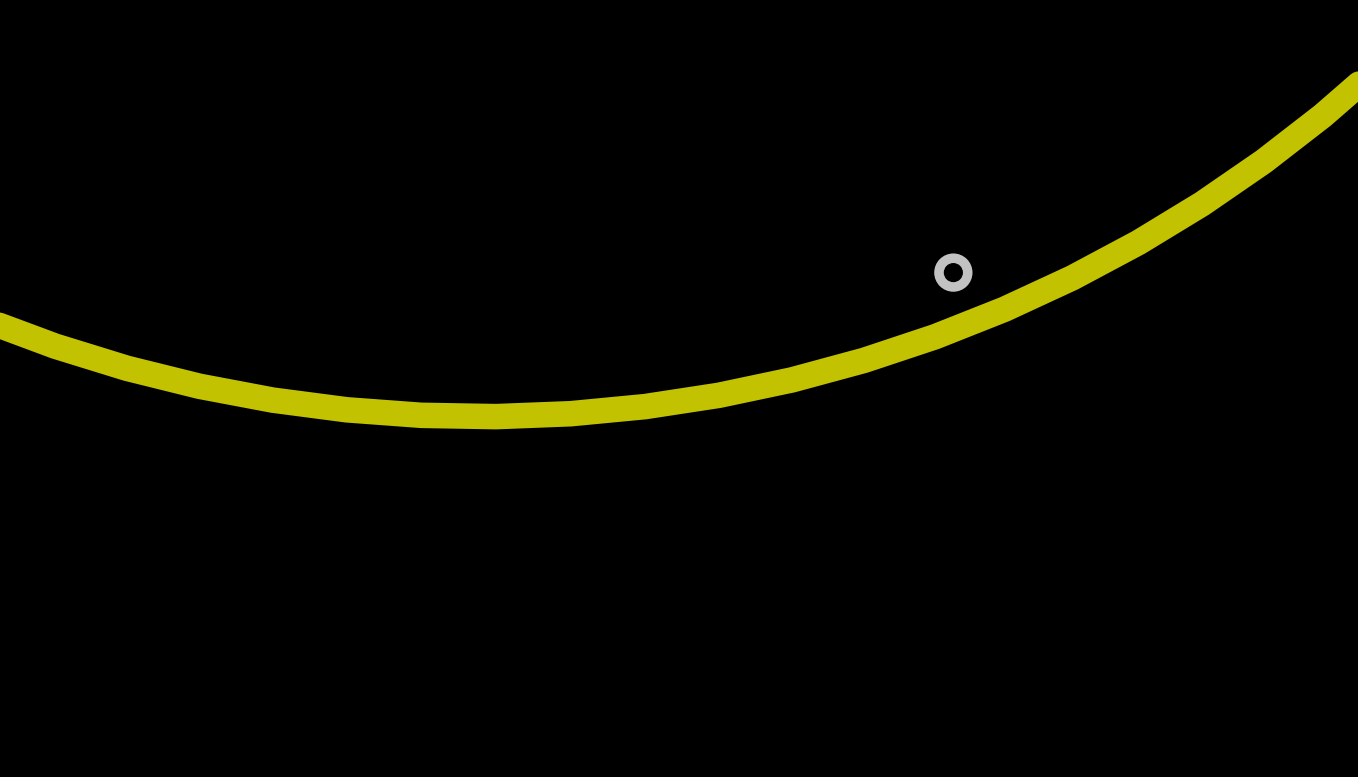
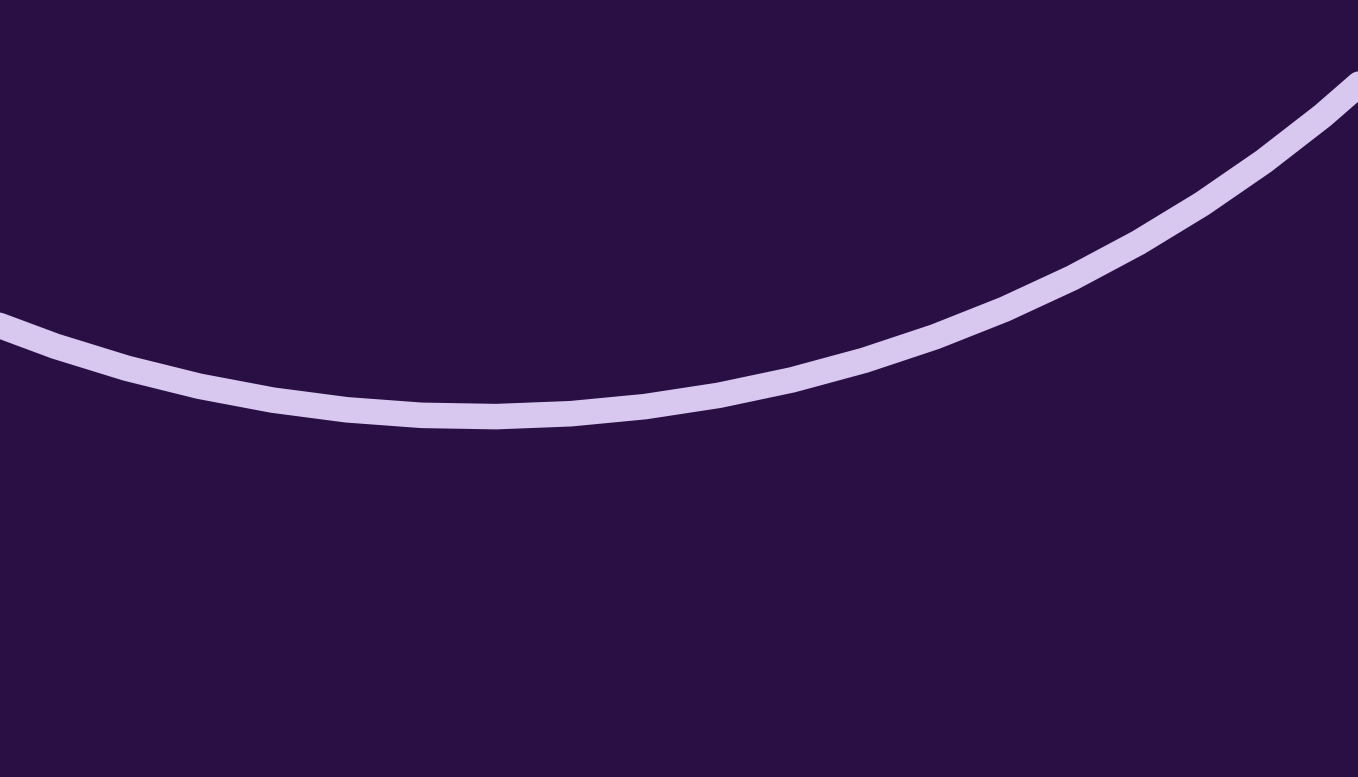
via: (953, 272) -> none

